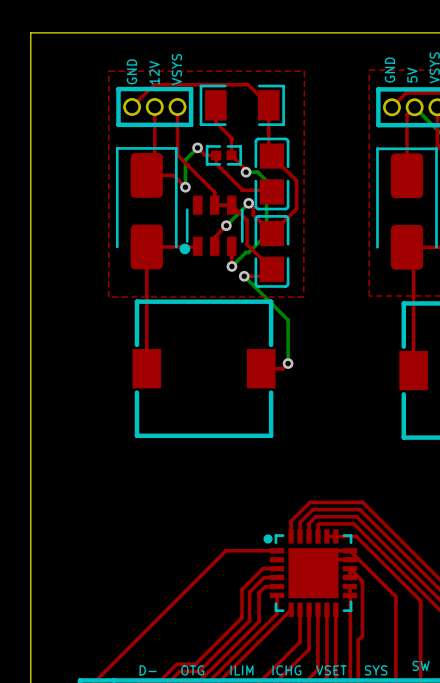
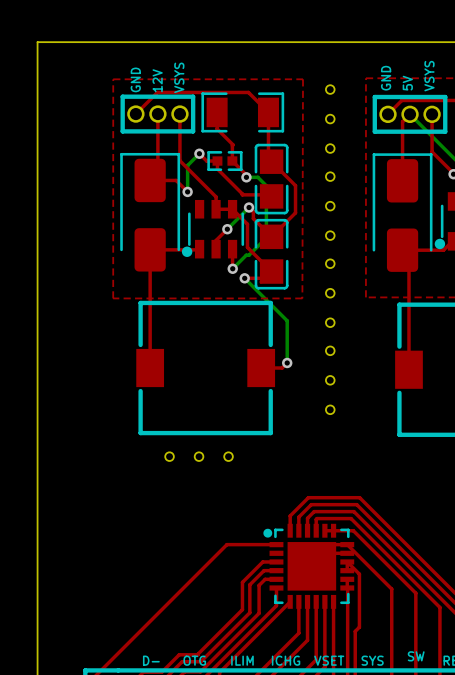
part: none -> (330, 119)
part: none -> (330, 206)
part: none -> (330, 293)
part: none -> (330, 380)
part: none -> (199, 456)

